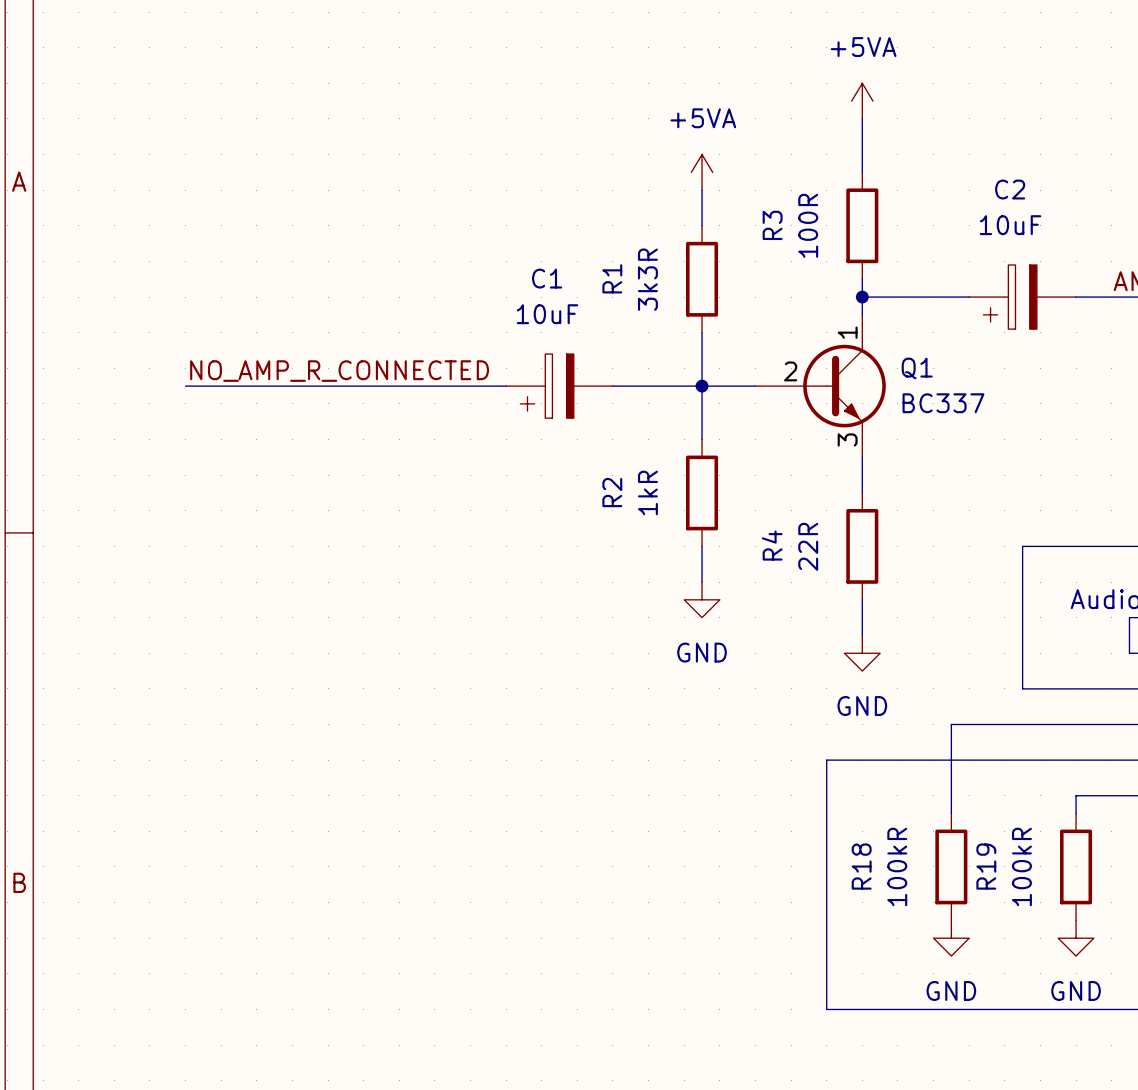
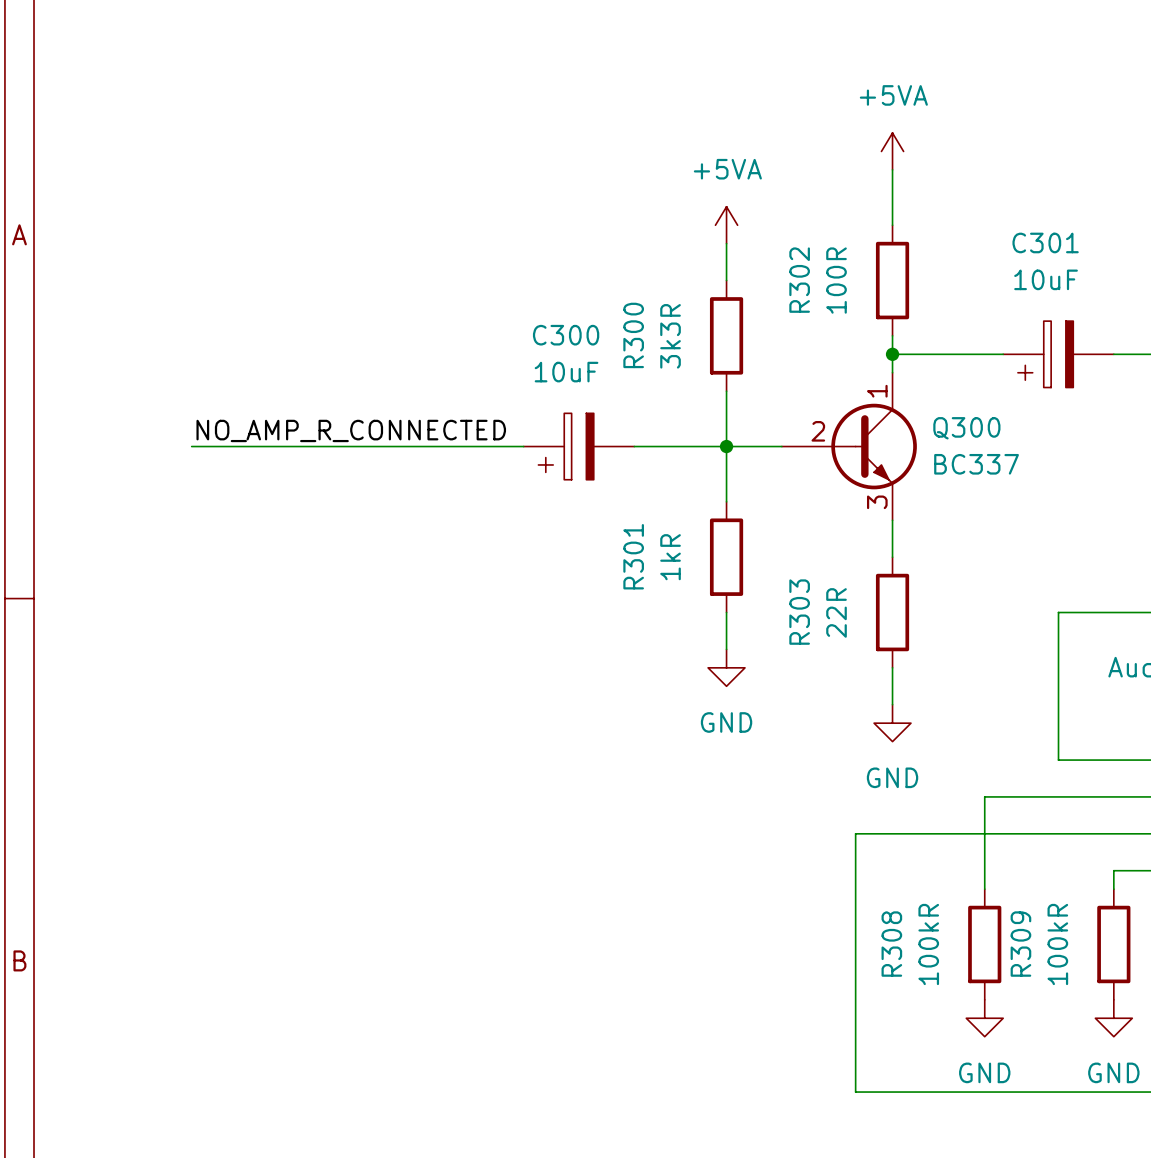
C2 name: C2 (1010, 189) -> C301 (1045, 242)
R3 name: R3 (772, 225) -> R302 (799, 280)
C1 name: C1 (547, 278) -> C300 (566, 335)
R1 name: R1 (612, 278) -> R300 (633, 335)
Q1 name: Q1 (917, 368) -> Q300 (966, 428)
R2 name: R2 (612, 492) -> R301 (633, 556)
R4 name: R4 (772, 545) -> R303 (799, 612)
R18 name: R18 (861, 866) -> R308 (891, 944)
R19 name: R19 (986, 866) -> R309 (1020, 944)

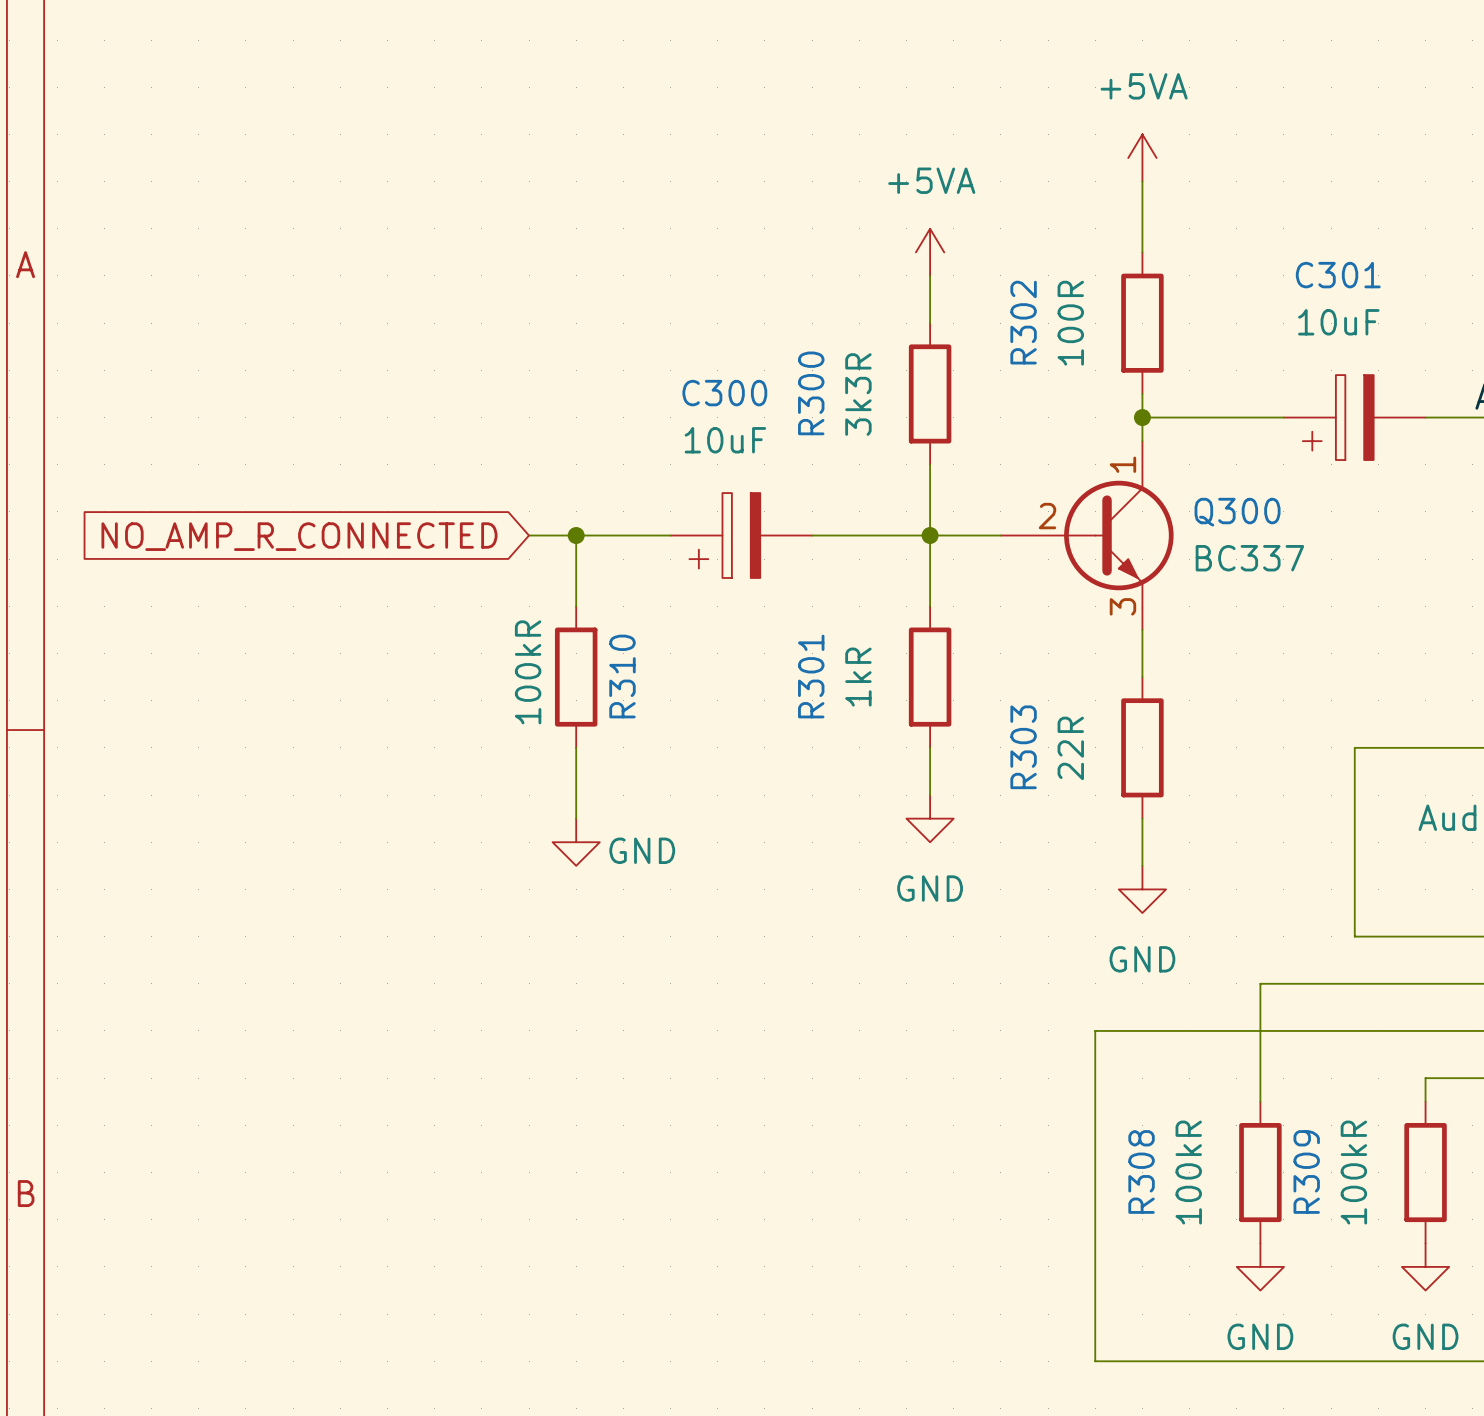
label: NO_AMP_R_CONNECTED (351, 430) -> none
wire: (191, 446) (413, 446) -> none
wire: none -> (576, 535) (576, 606)
junction: none -> (576, 535)
global label: none -> NO_AMP_R_CONNECTED (299, 536)
R310: none -> 100kR (576, 677)
wire: none -> (576, 747) (576, 818)
power symbol: none -> GND (576, 842)

